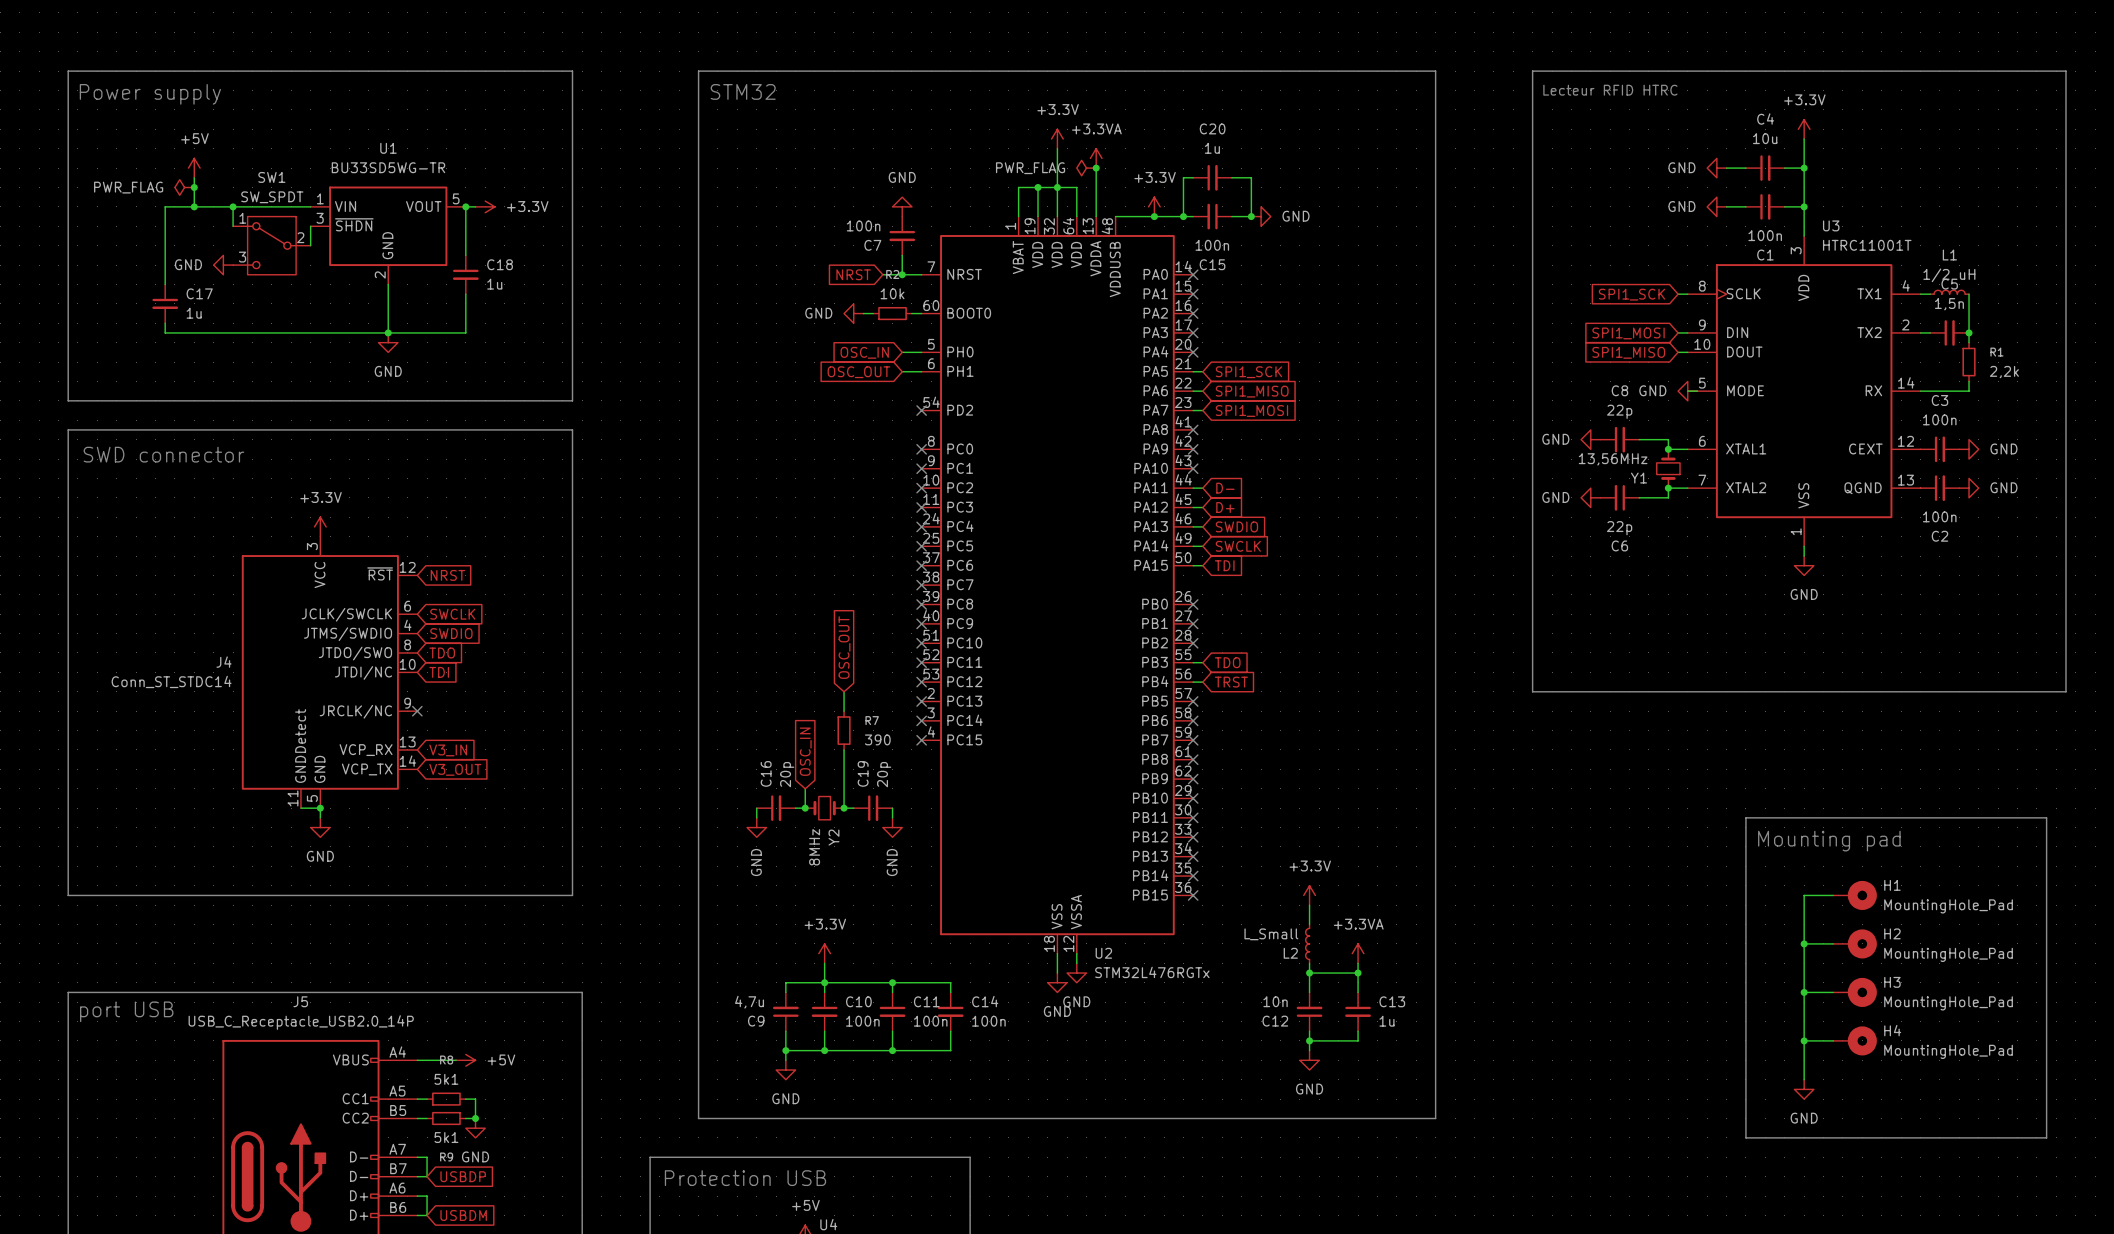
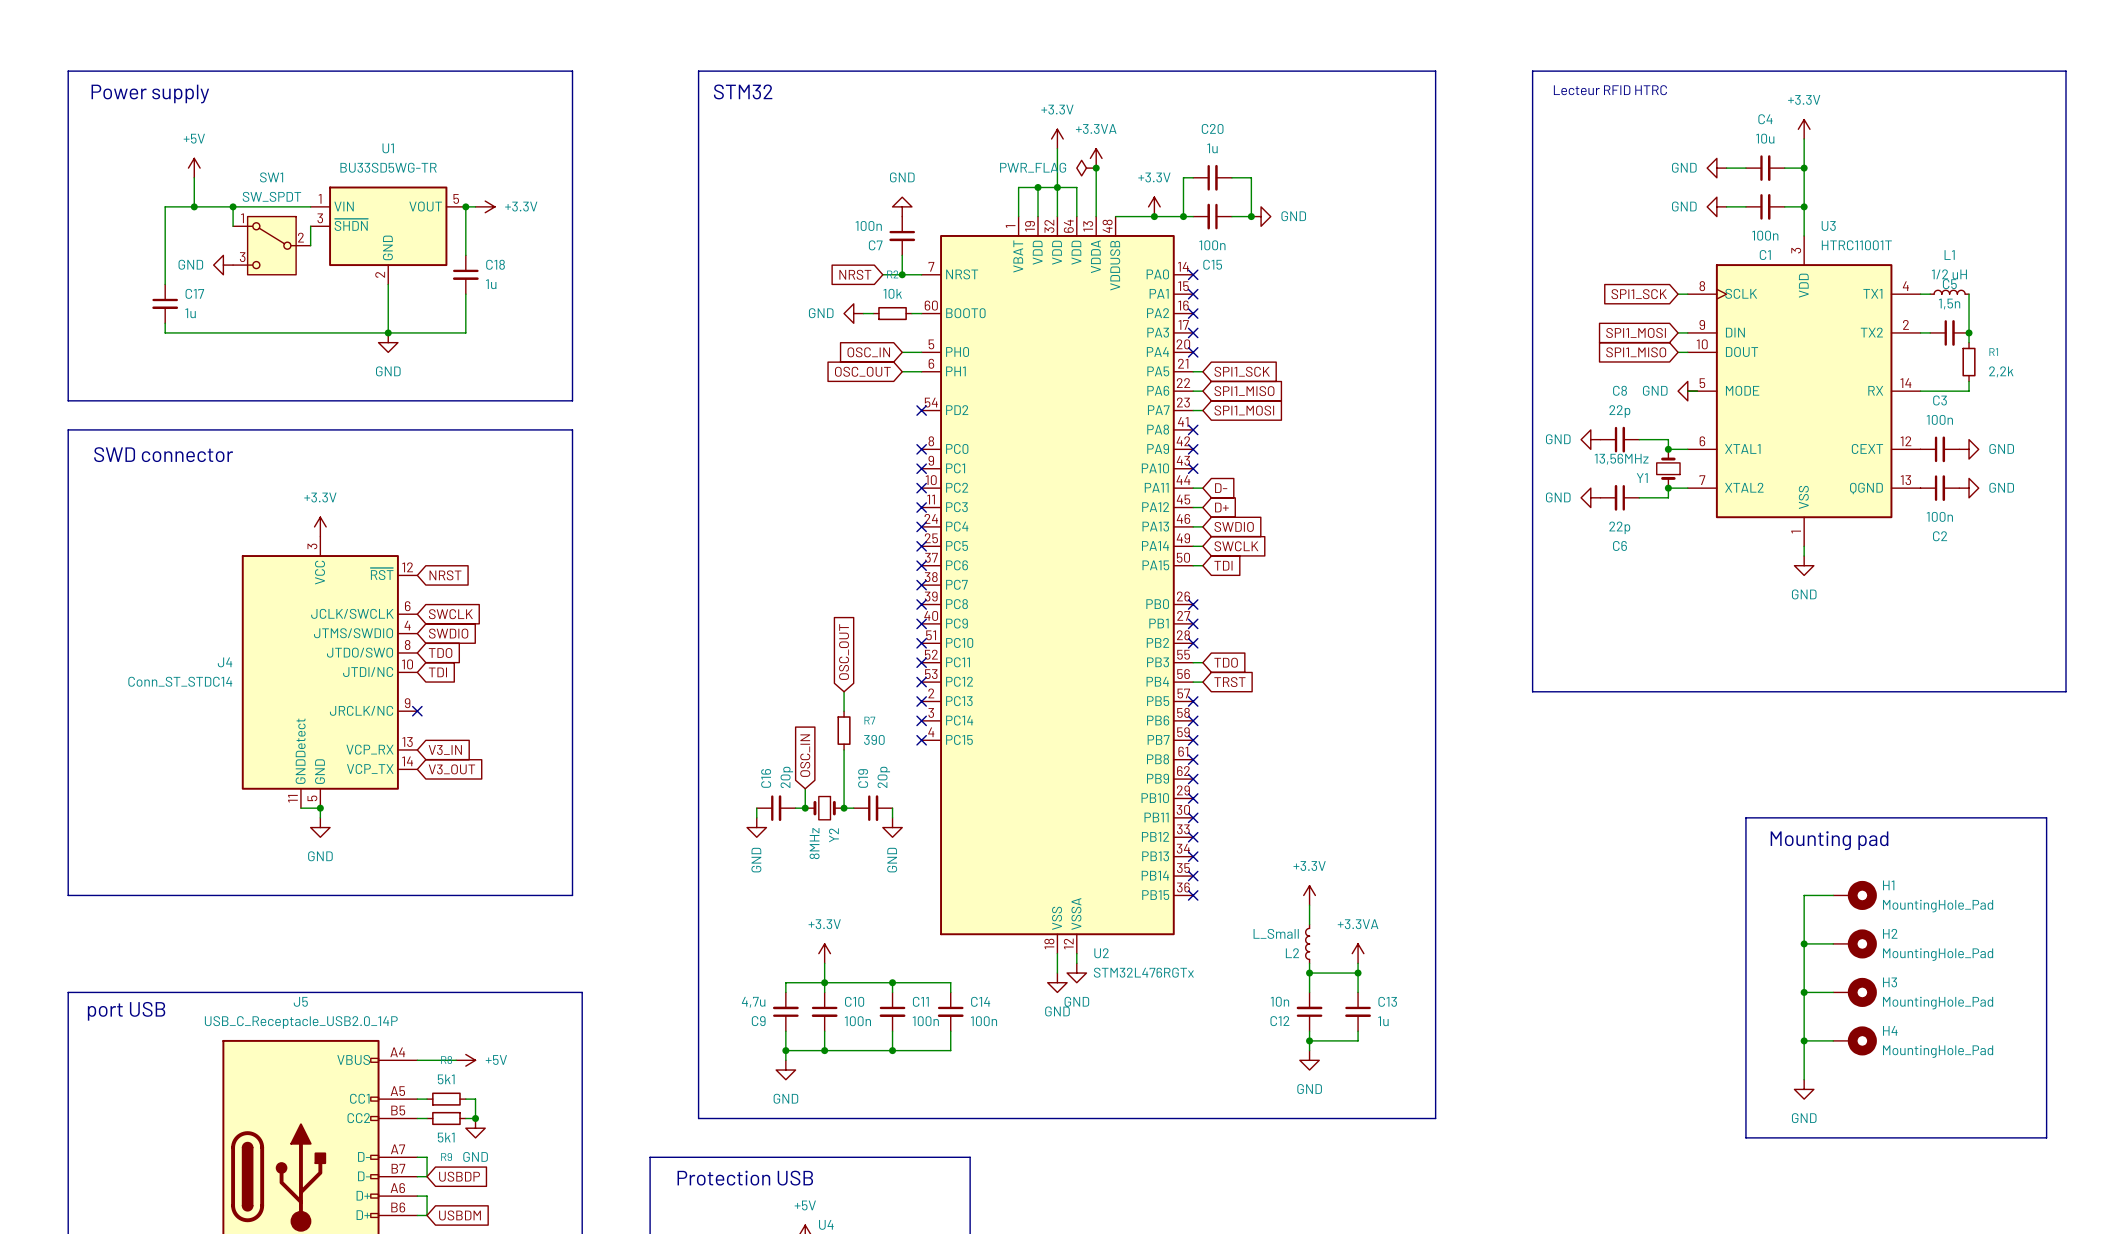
power symbol: PWR_FLAG (184, 187) -> none
junction: (194, 187) -> none

